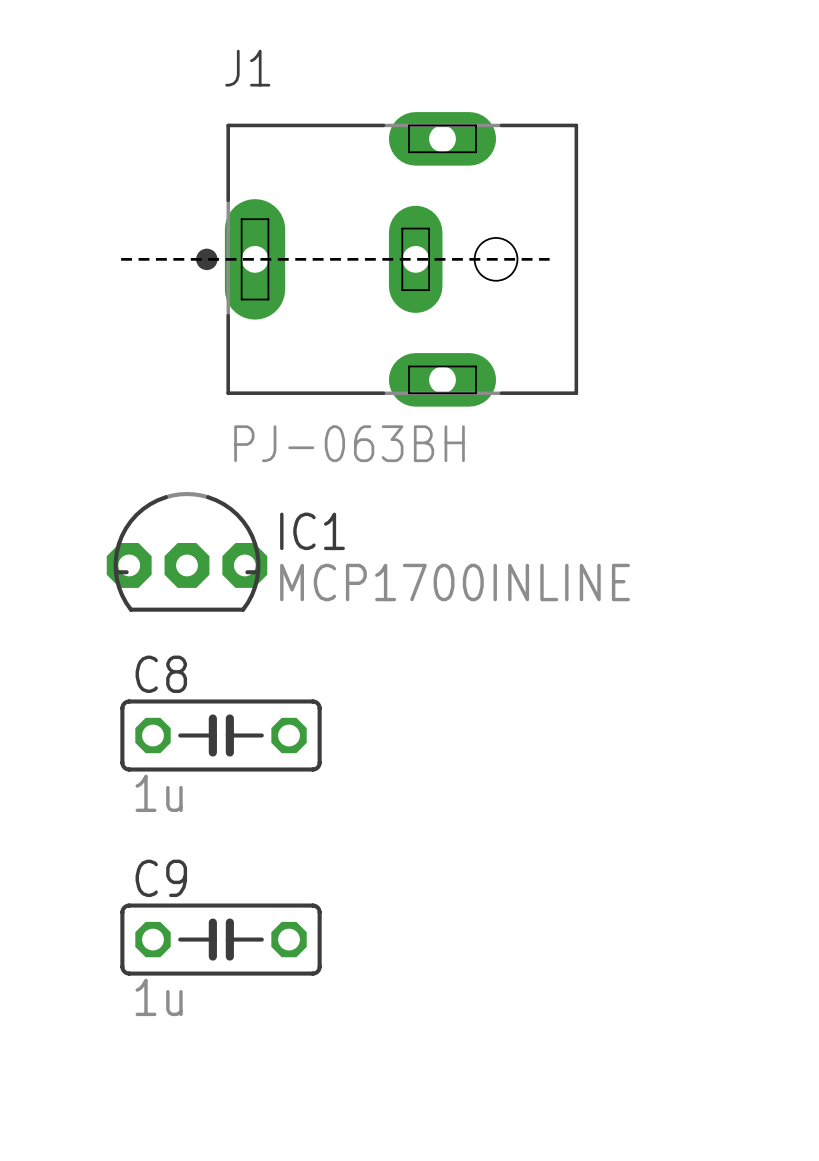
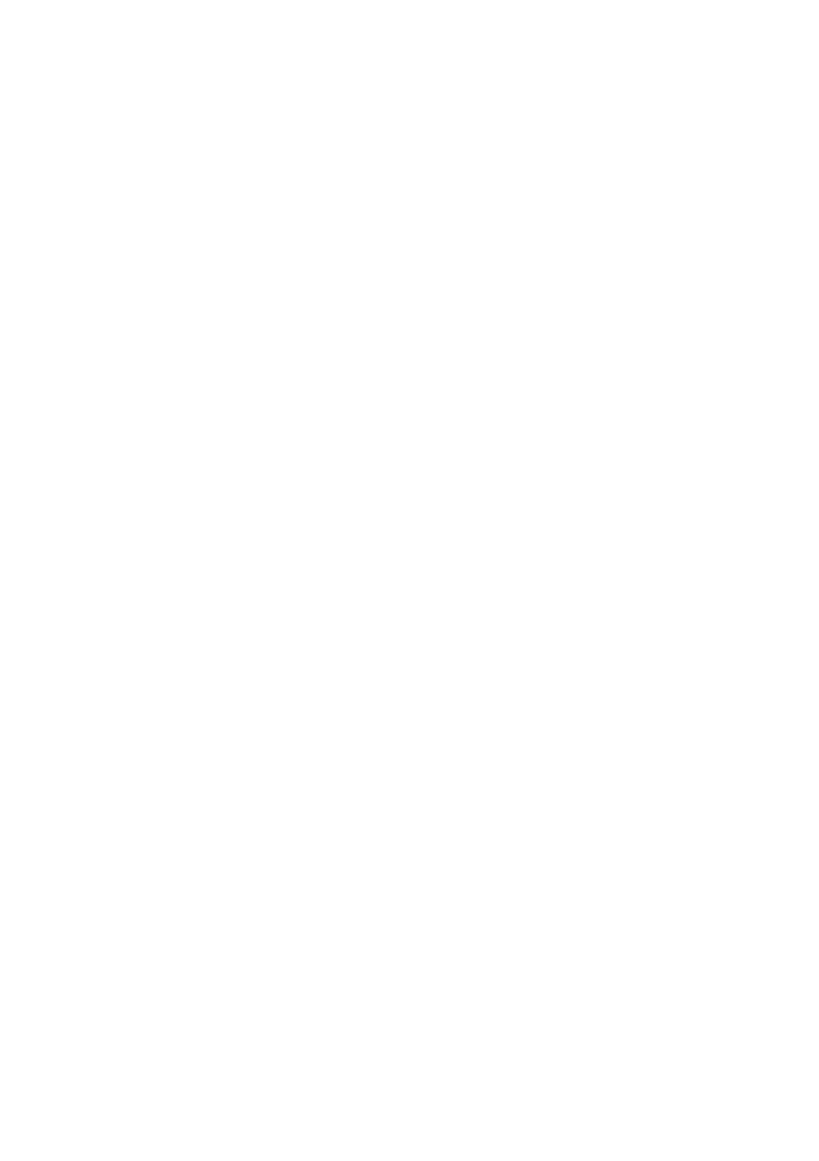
J1: PJ-063BH (348, 259) -> none
IC1: MCP1700INLINE (187, 551) -> none
C8: 1u (221, 735) -> none
C9: 1u (221, 939) -> none

